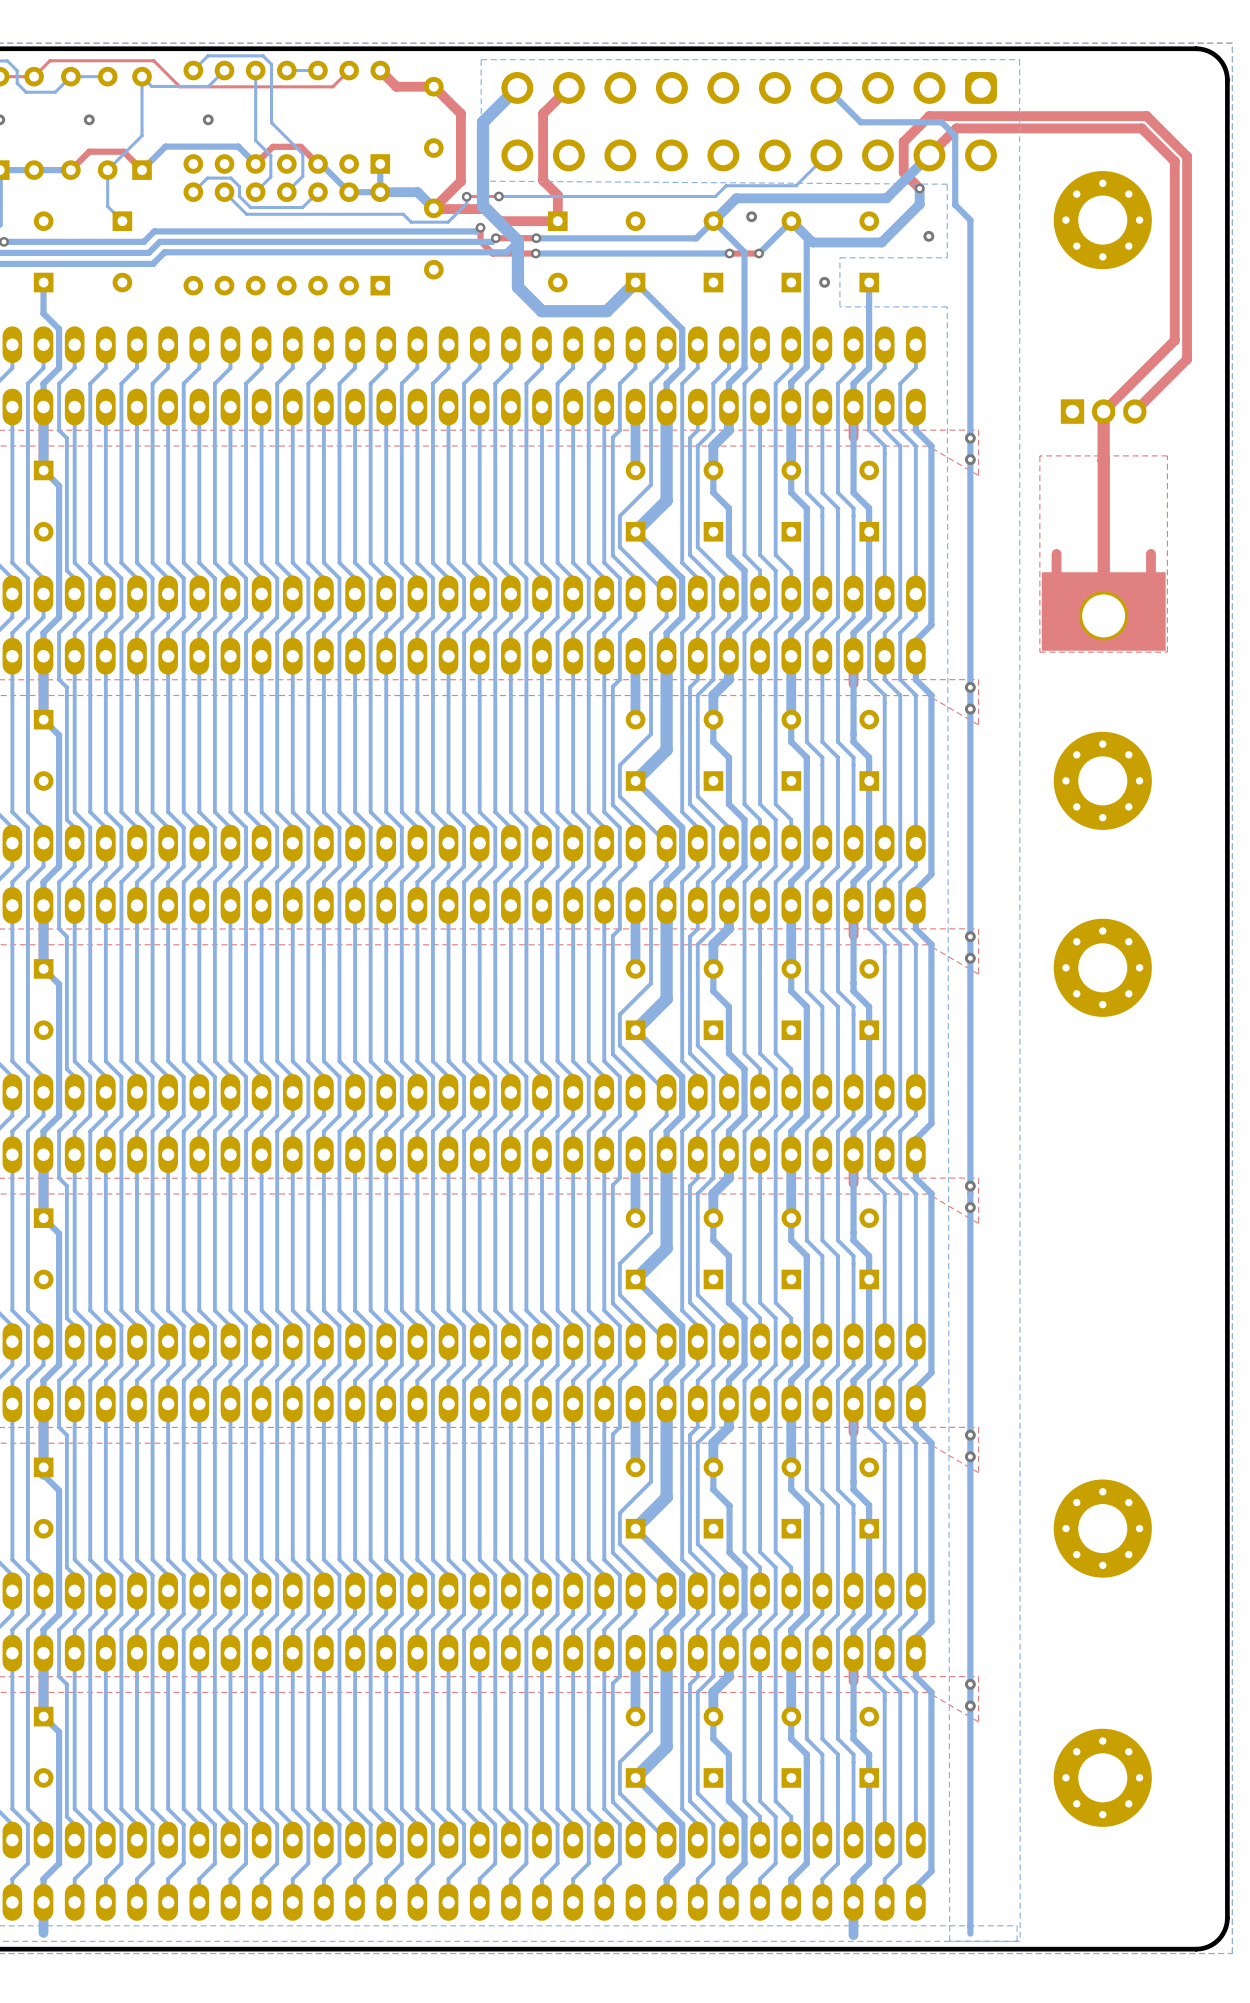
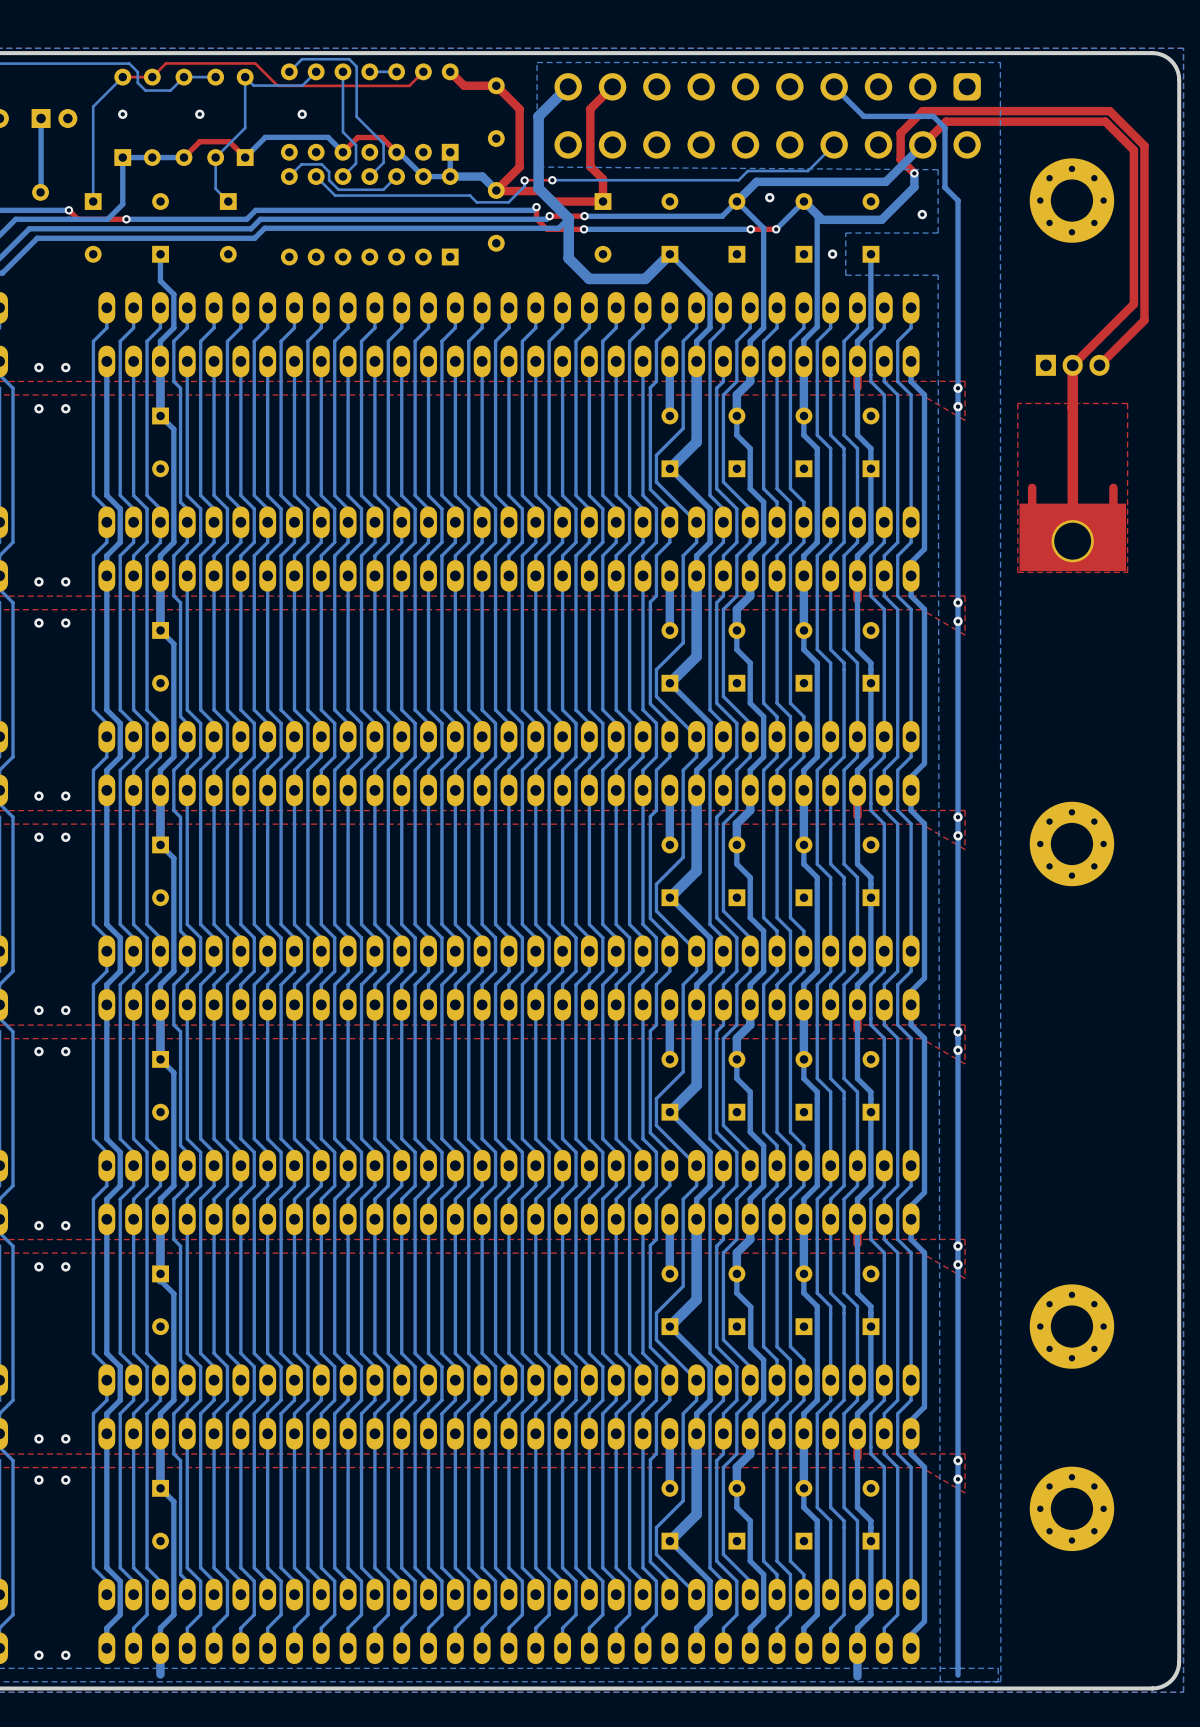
part: (1102, 780) -> none
part position: (1102, 1777) -> (1071, 1508)

